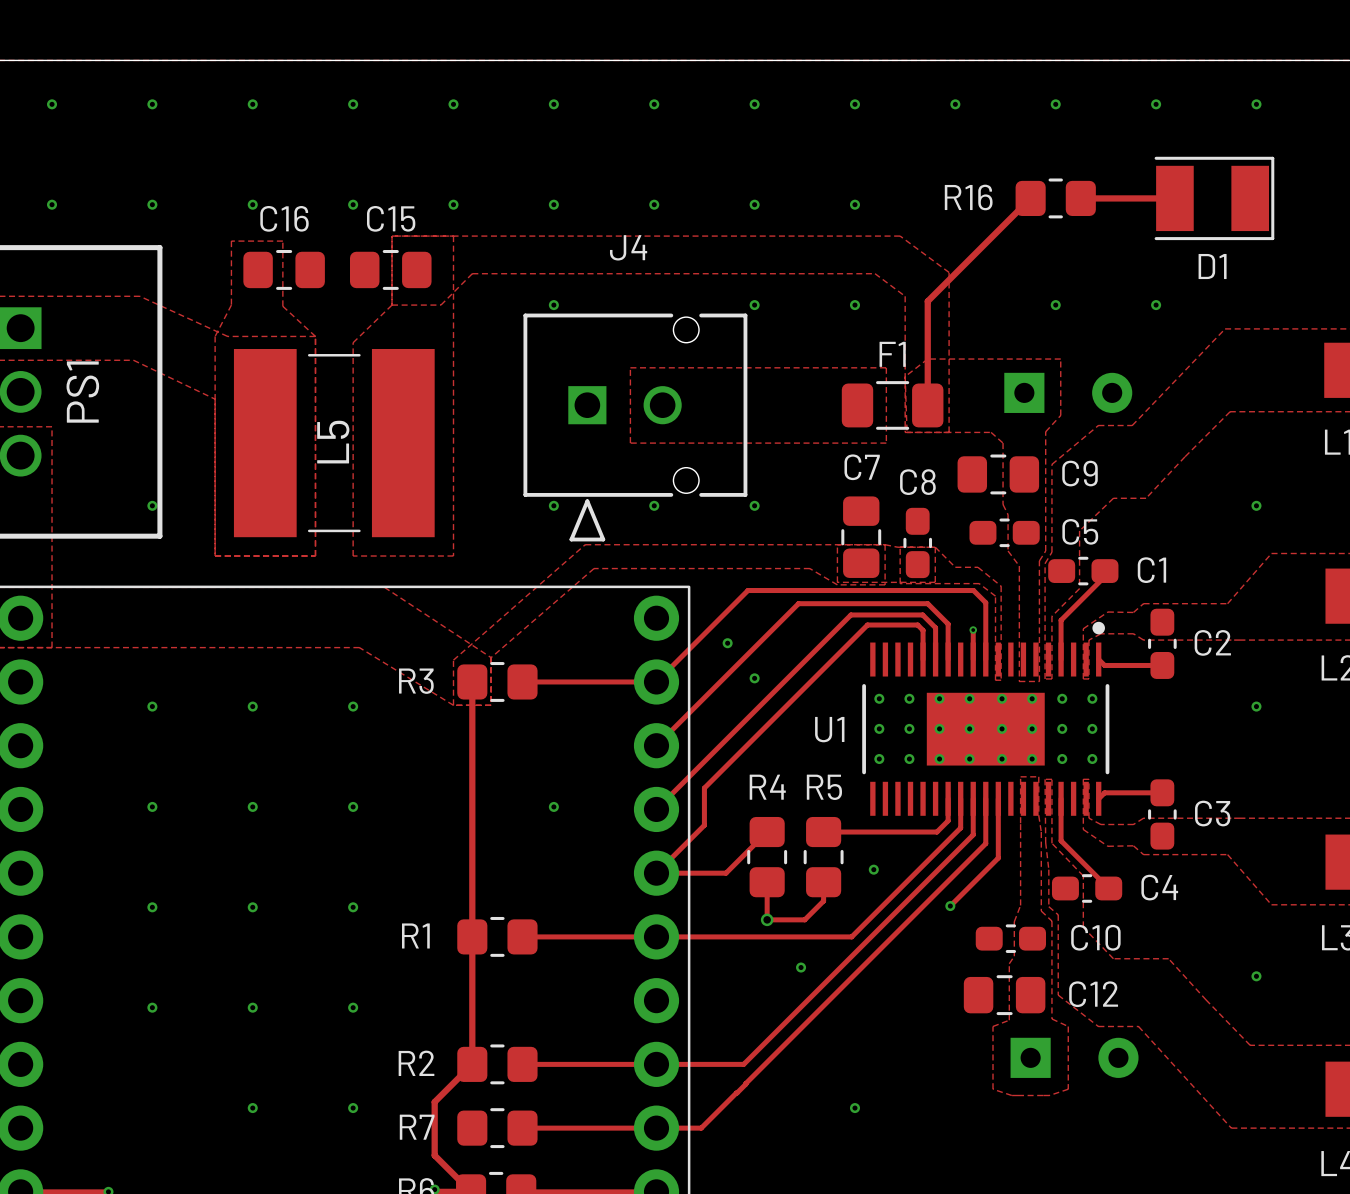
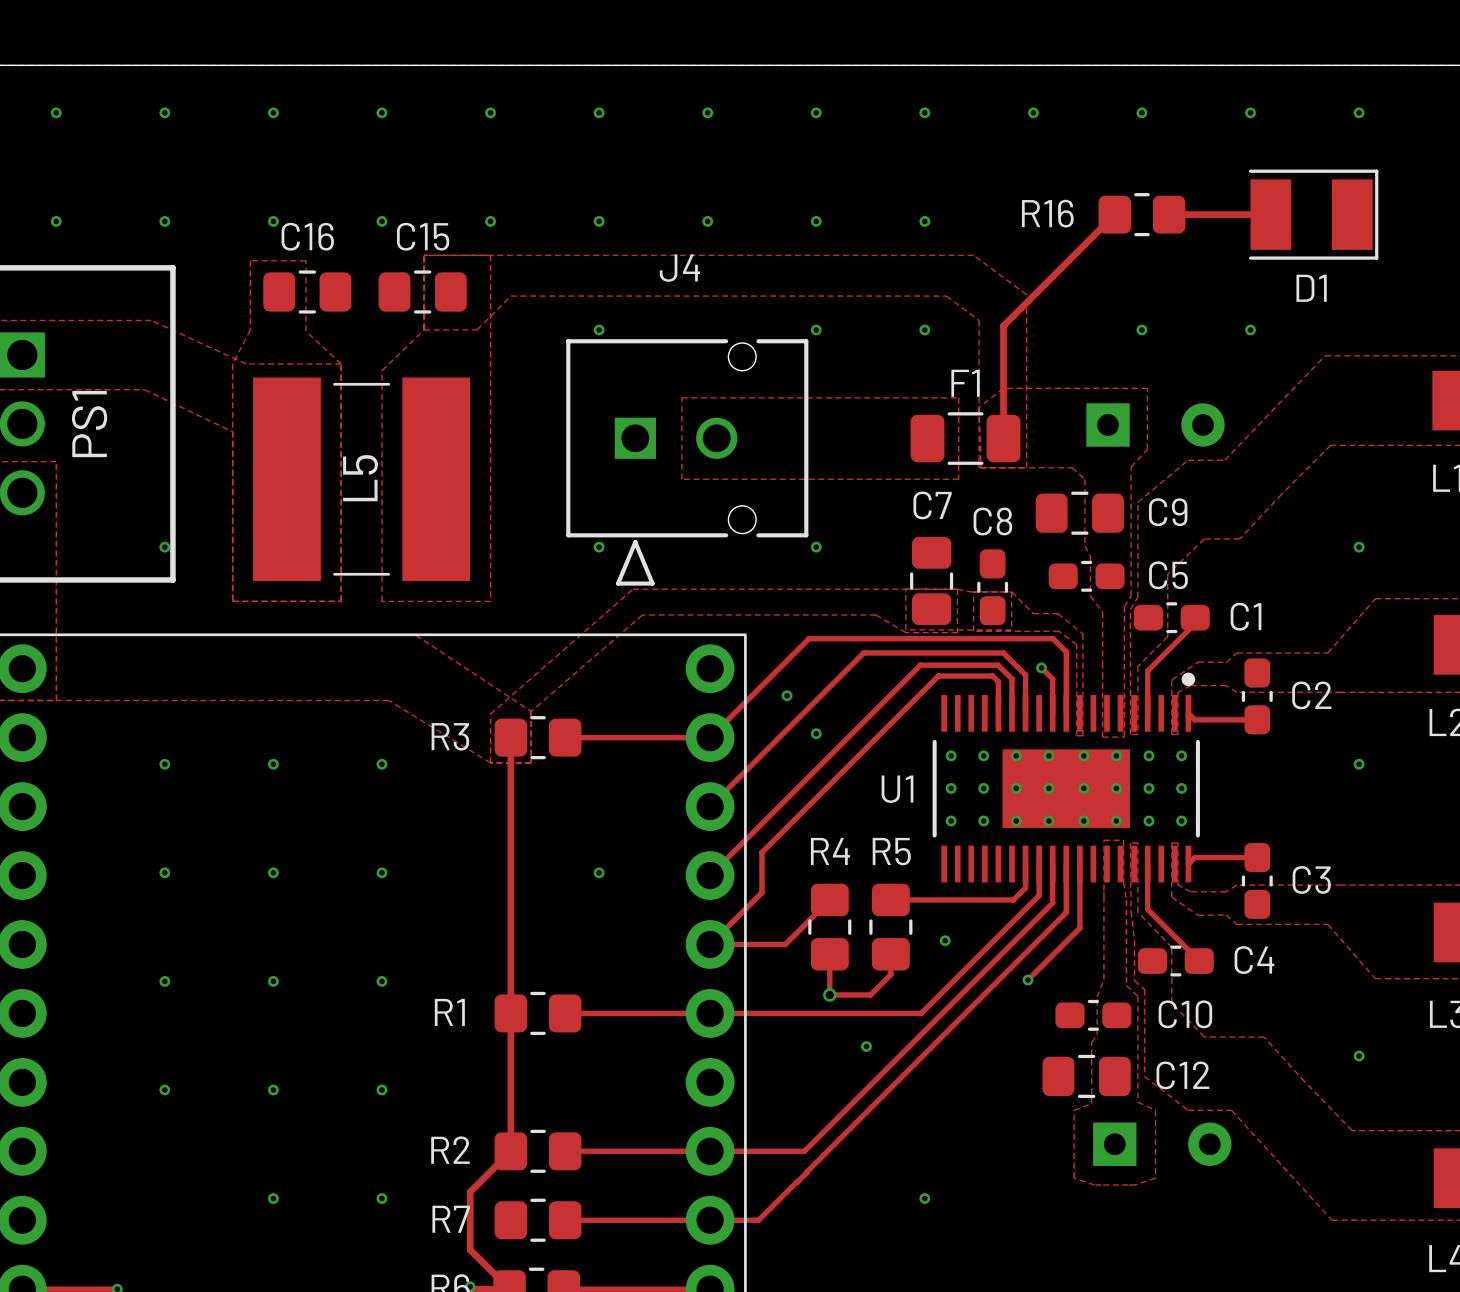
via: (654, 505) -> none
track: none -> (1041, 667) (1052, 679) (1052, 681)
via: none -> (1041, 667)
via: (973, 630) -> none

